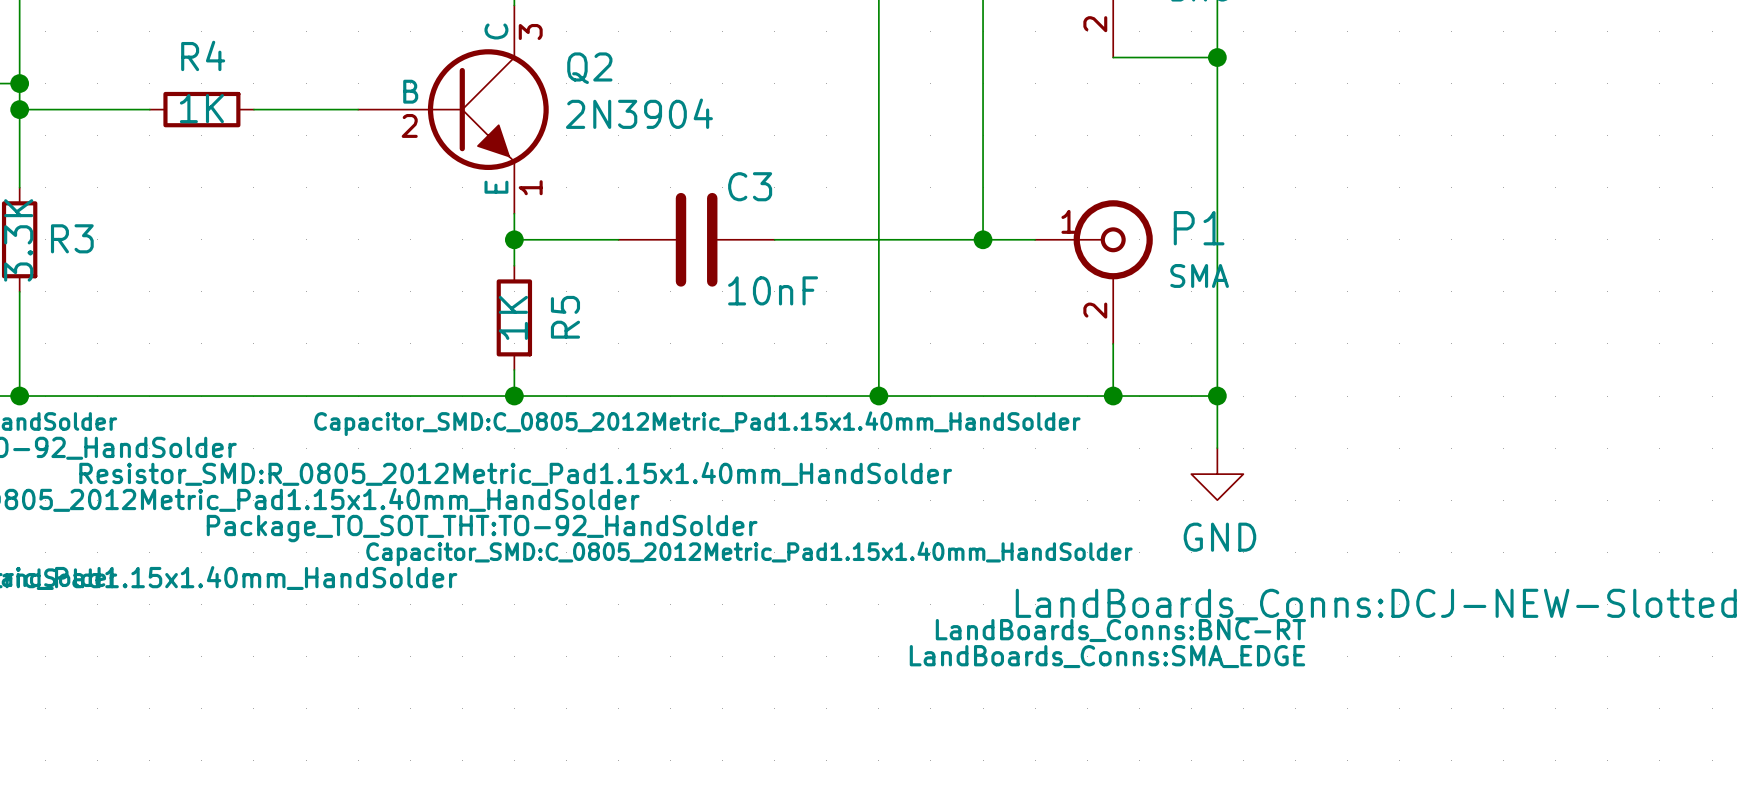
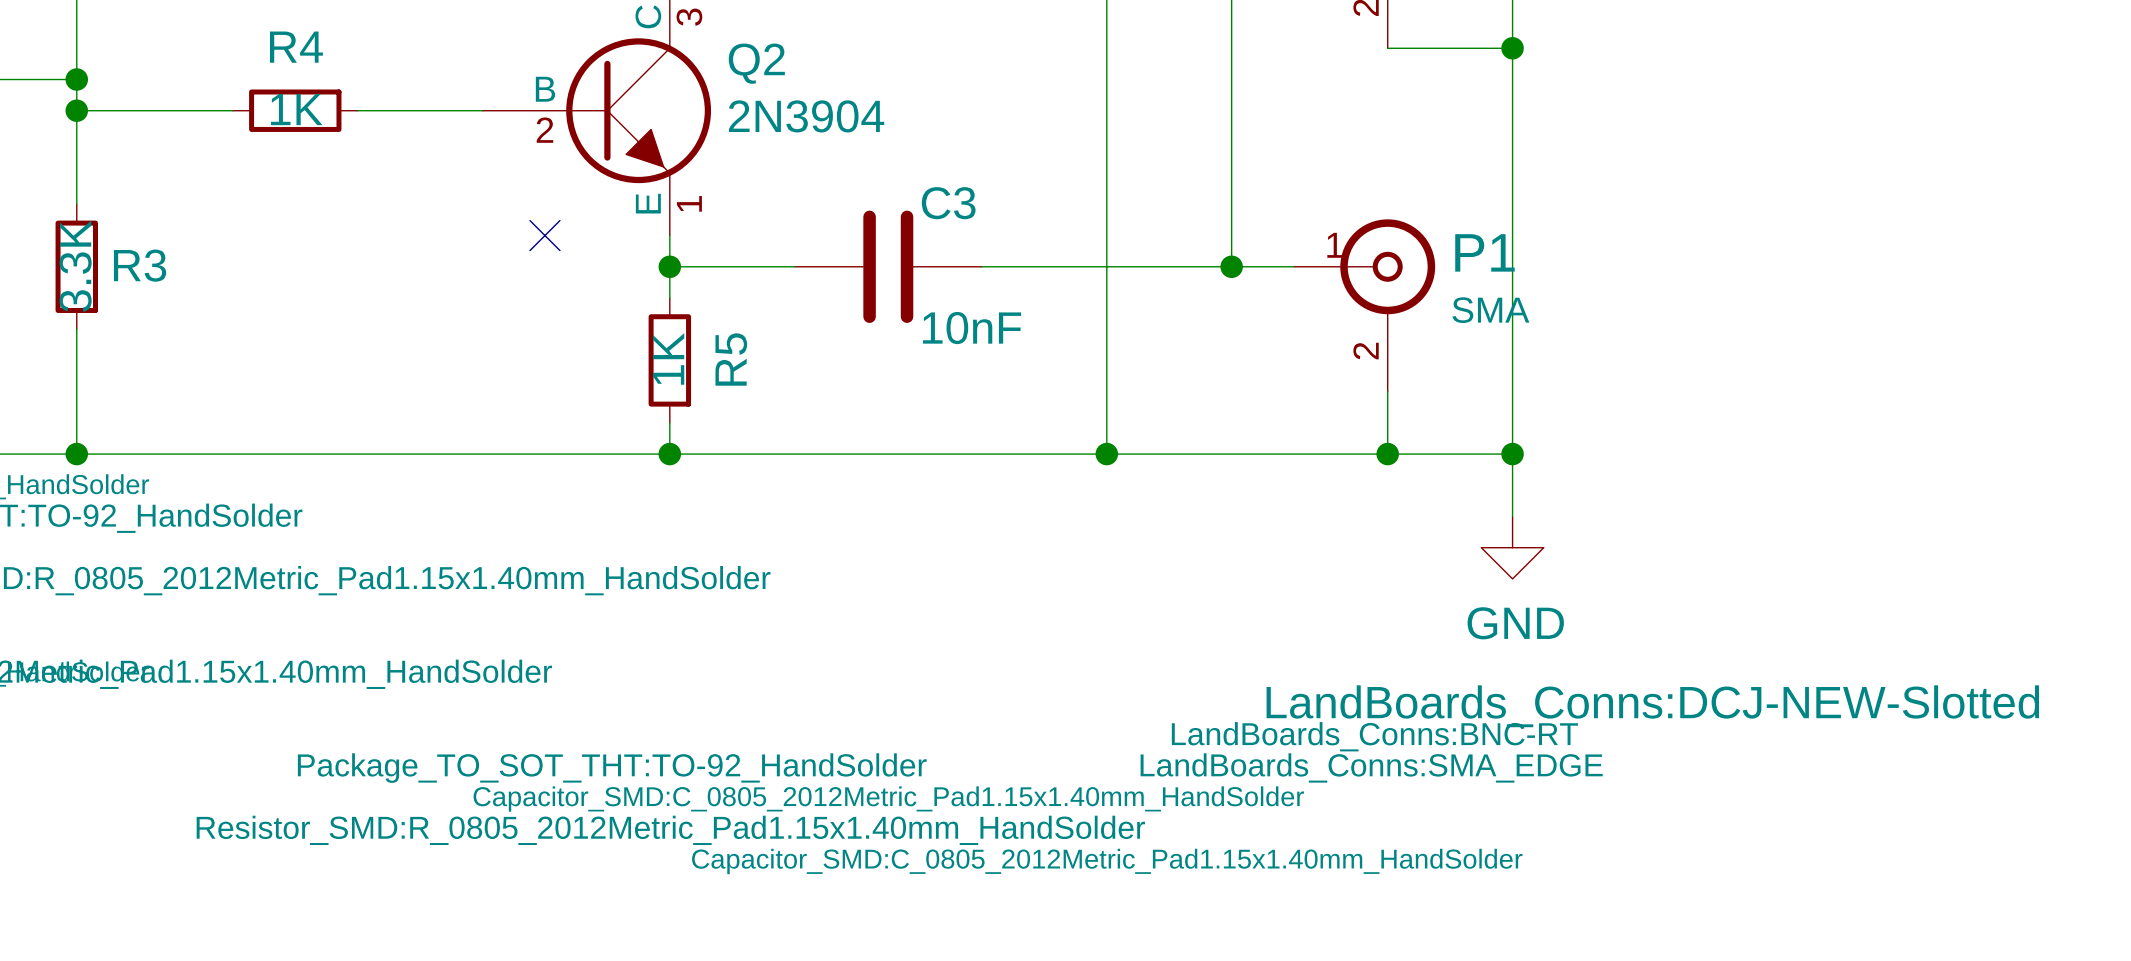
no-connect mark: none -> (544, 235)
C3 text position: Capacitor_SMD:C_0805_2012Metric_Pad1.15x1.40mm_HandSolder (697, 423) -> Capacitor_SMD:C_0805_2012Metric_Pad1.15x1.40mm_HandSolder (888, 799)
R5 text position: Resistor_SMD:R_0805_2012Metric_Pad1.15x1.40mm_HandSolder (515, 473) -> Resistor_SMD:R_0805_2012Metric_Pad1.15x1.40mm_HandSolder (670, 830)
Q2 text position: Package_TO_SOT_THT:TO-92_HandSolder (482, 528) -> Package_TO_SOT_THT:TO-92_HandSolder (612, 768)
part text position: Capacitor_SMD:C_0805_2012Metric_Pad1.15x1.40mm_HandSolder (749, 553) -> Capacitor_SMD:C_0805_2012Metric_Pad1.15x1.40mm_HandSolder (1107, 861)

